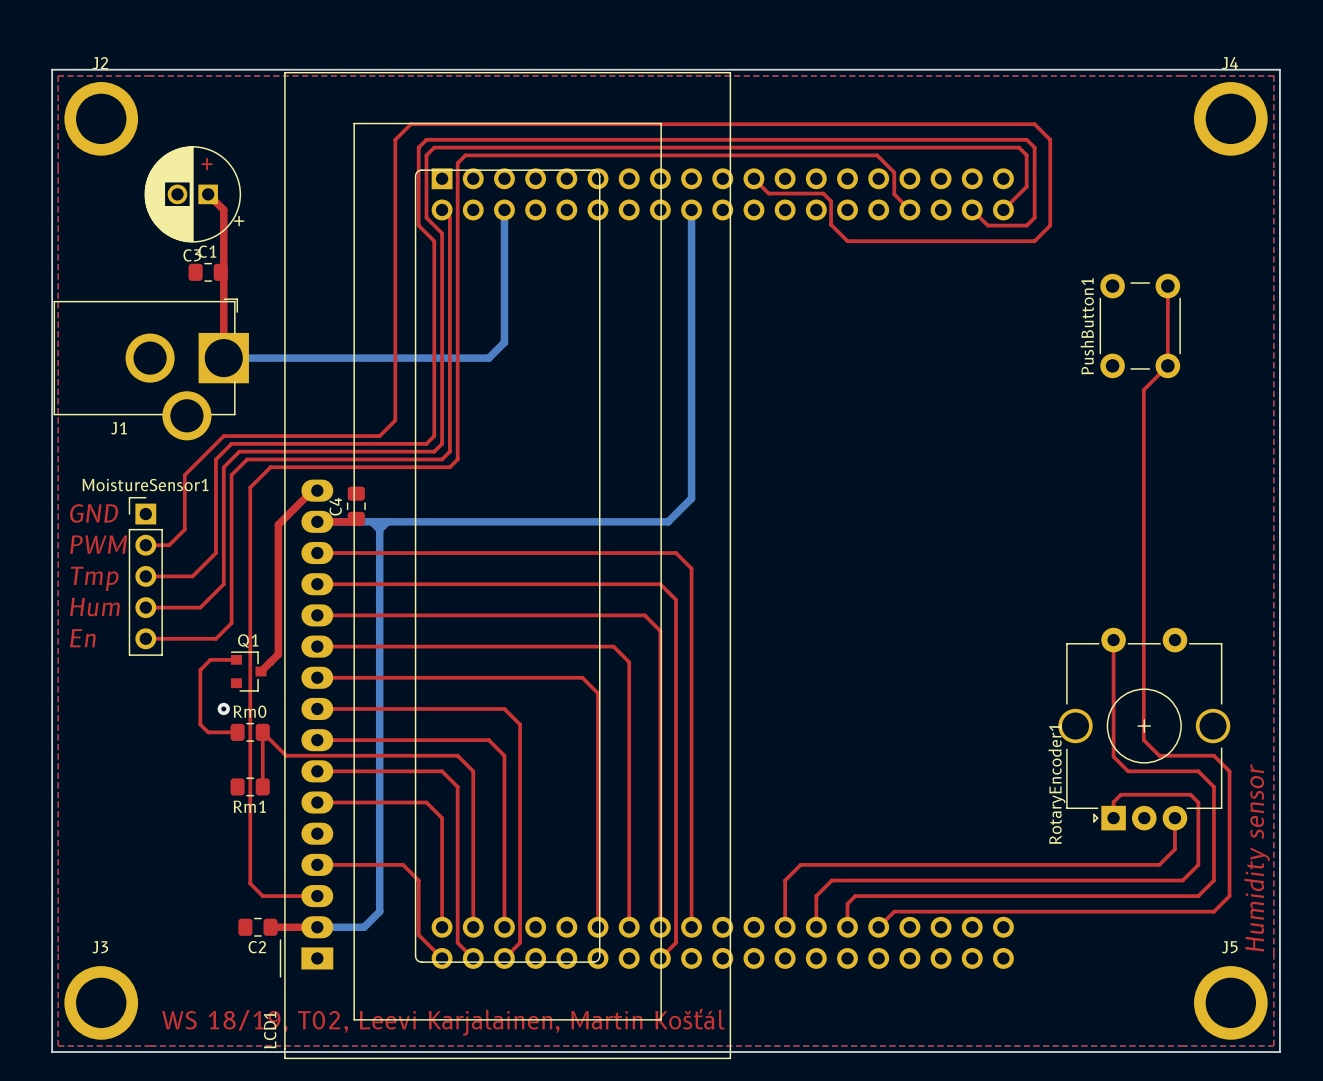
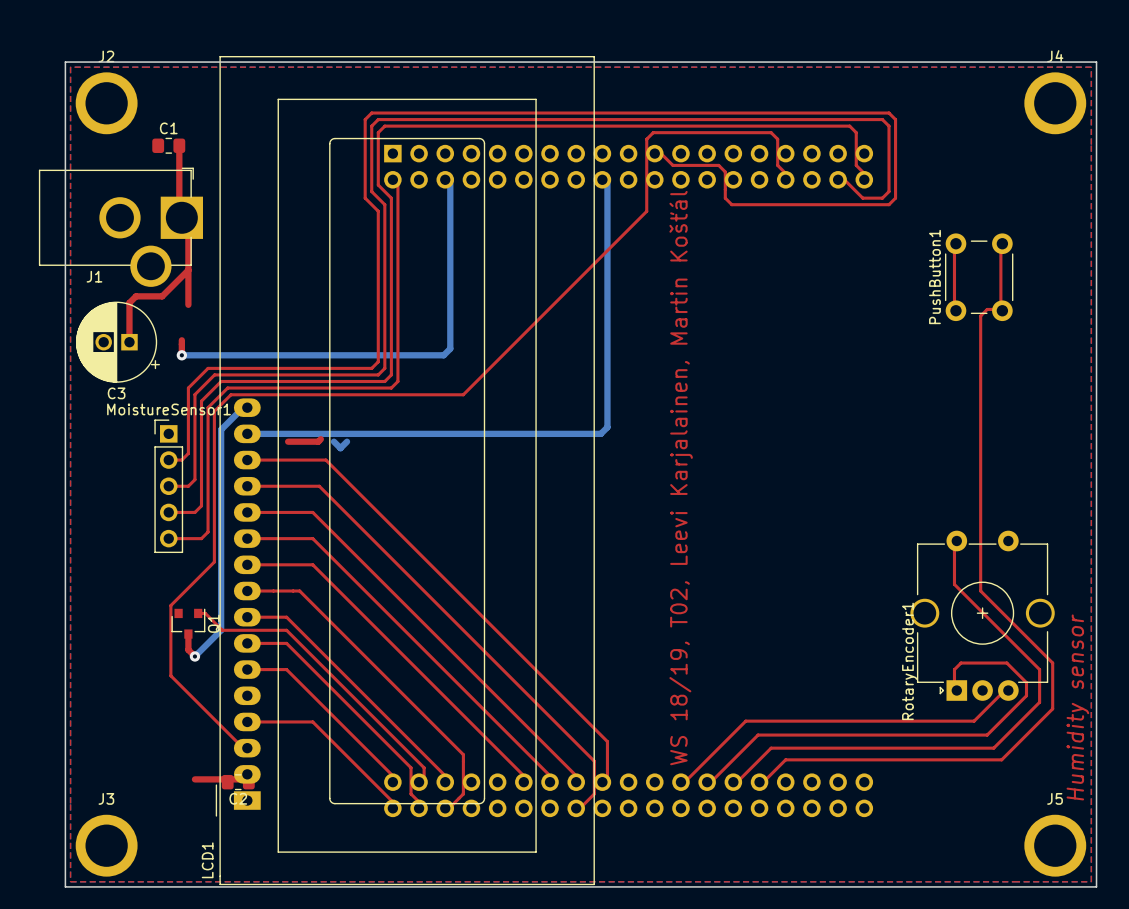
text: + (207, 164) -> none
top track: none -> (179, 145) (179, 215) (188, 224) (188, 304)
top track: none -> (659, 152) (672, 165) (718, 165) (725, 171) (725, 198) (731, 204) (889, 204) (895, 198) (895, 119) (889, 113) (371, 113) (365, 119) (365, 198) (378, 211) (378, 361) (371, 368) (208, 368) (188, 388) (188, 453) (181, 460) (168, 460)
top track: (753, 178) (768, 193) (823, 193) (831, 201) (831, 224) (847, 241) (1034, 241) (1050, 225) (1050, 139) (1034, 124) (410, 124) (395, 139) (395, 420) (379, 436) (223, 436) (184, 475) (184, 529) (169, 545) (145, 545) -> none
C3 position: (194, 194) -> (117, 342)
top track: (208, 194) (223, 209) (223, 358) -> none
top track: none -> (397, 178) (397, 381) (391, 388) (227, 388) (208, 407) (208, 532) (201, 538) (168, 538)
bottom track: none -> (450, 178) (450, 348) (443, 355) (181, 355)
bottom track: none -> (607, 178) (607, 427) (600, 433) (247, 433)
top track: none -> (790, 178) (777, 165) (777, 139) (771, 132) (653, 132) (646, 139) (646, 211) (463, 394) (230, 394) (214, 411) (214, 562) (170, 605) (170, 675) (243, 748) (247, 748)
top track: none -> (843, 178) (862, 198) (882, 198) (889, 191) (889, 126) (882, 119) (378, 119) (371, 126) (371, 191) (384, 204) (384, 368) (378, 374) (214, 374) (194, 394) (194, 479) (188, 486) (168, 486)
top track: none -> (869, 178) (856, 165) (856, 132) (849, 126) (384, 126) (378, 132) (378, 185) (391, 198) (391, 374) (384, 381) (221, 381) (201, 401) (201, 505) (194, 512) (168, 512)
top track: (442, 209) (449, 217) (449, 451) (442, 459) (247, 459) (231, 475) (231, 623) (215, 638) (145, 638) -> none
bottom track: (504, 209) (504, 342) (488, 358) (223, 358) -> none
bottom track: (691, 209) (691, 498) (668, 521) (317, 521) -> none
top track: (909, 209) (894, 194) (894, 172) (877, 155) (465, 155) (457, 163) (457, 459) (449, 467) (270, 467) (250, 487) (250, 883) (262, 896) (317, 896) -> none
top track: (972, 209) (987, 225) (1026, 225) (1034, 217) (1034, 147) (1026, 139) (426, 139) (418, 147) (418, 225) (434, 241) (434, 436) (426, 443) (231, 443) (215, 459) (215, 553) (192, 576) (145, 576) -> none
top track: (1003, 209) (1026, 186) (1026, 155) (1019, 147) (434, 147) (426, 155) (426, 217) (442, 233) (442, 443) (434, 451) (239, 451) (223, 467) (223, 584) (200, 607) (145, 607) -> none
C1 position: (208, 272) -> (168, 145)
top track: none -> (954, 242) (954, 309)
top track: none -> (1000, 242) (1000, 309) (987, 309) (980, 316) (980, 591) (1052, 663) (1052, 708) (1001, 759) (785, 759) (764, 780)
top track: (1167, 286) (1167, 365) (1143, 389) (1143, 740) (1159, 755) (1213, 755) (1229, 771) (1229, 896) (1213, 911) (894, 911) (878, 927) -> none
top track: none -> (188, 270) (162, 296) (136, 296) (129, 302) (129, 342)
J1 position: (151, 369) -> (120, 227)
top track: none -> (181, 340) (181, 355)
via: none -> (181, 355)
bottom track: none -> (247, 407) (243, 407) (221, 429) (221, 630) (194, 656)
top track: (317, 490) (312, 490) (278, 524) (278, 654) (270, 662) -> none
C4: (356, 506) -> none
text: GND (94, 513) -> none
bottom track: (379, 521) (379, 911) (364, 927) (317, 927) -> none
top track: none -> (247, 460) (325, 460) (607, 741) (607, 780)
text: PWM (98, 544) -> none
top track: (317, 553) (675, 553) (691, 568) (691, 925) -> none
LCD1 position: (505, 565) -> (405, 470)
top track: none -> (247, 486) (319, 486) (594, 761) (594, 793) (581, 807)
MoistureSensor1 position: (145, 576) -> (168, 486)
text: Tmp (94, 578) -> none
top track: (317, 584) (660, 584) (675, 599) (675, 942) (660, 958) -> none
top track: none -> (247, 512) (312, 512) (581, 780)
text: Hum (94, 607) -> none
top track: (317, 615) (644, 615) (660, 630) (660, 927) -> none
text: none -> WS 18/19, T02, Leevi Karjalainen, Martin Košťál (681, 478)
top track: none -> (247, 538) (312, 538) (555, 780)
text: En (82, 638) -> none
top track: none -> (954, 539) (954, 584) (1039, 669) (1039, 702) (993, 748) (771, 748) (738, 780)
top track: (1113, 640) (1113, 756) (1128, 771) (1198, 771) (1213, 786) (1213, 880) (1198, 896) (855, 896) (847, 903) (847, 927) -> none
top track: (317, 646) (613, 646) (629, 662) (629, 927) -> none
top track: (236, 659) (210, 659) (200, 669) (200, 724) (208, 732) (237, 732) -> none
top track: none -> (247, 564) (312, 564) (528, 780)
Q1 rotation: 0° (248, 671) -> 90° clockwise (188, 623)
Q1 position: (248, 671) -> (188, 623)
top track: (317, 677) (582, 677) (598, 693) (598, 927) -> none
top track: none -> (247, 591) (299, 591) (463, 754) (463, 793) (450, 807)
via position: (223, 708) -> (194, 656)
top track: (317, 708) (504, 708) (520, 724) (520, 942) (504, 958) -> none
top track: none -> (198, 613) (205, 613) (222, 630) (286, 630) (424, 767) (424, 780)
top track: none -> (247, 617) (286, 617) (450, 780)
Rm0: (250, 732) -> none
top track: (317, 740) (488, 740) (504, 755) (504, 927) -> none
top track: none -> (188, 634) (188, 649) (194, 656)
top track: none -> (247, 643) (286, 643) (411, 767) (411, 793) (424, 807)
top track: (317, 771) (442, 771) (457, 786) (457, 942) (473, 958) -> none
Rm1: (250, 786) -> none
top track: (262, 786) (262, 732) (286, 755) (457, 755) (473, 771) (473, 927) -> none
top track: none -> (247, 669) (286, 669) (397, 780)
top track: (317, 802) (426, 802) (442, 818) (442, 927) -> none
top track: none -> (954, 689) (954, 669) (961, 663) (1006, 663) (1026, 682) (1026, 695) (987, 735) (758, 735) (712, 780)
top track: none -> (1006, 689) (974, 721) (745, 721) (686, 780)
top track: (1113, 818) (1113, 802) (1120, 794) (1190, 794) (1198, 802) (1198, 864) (1182, 880) (831, 880) (816, 896) (816, 927) -> none
top track: (1174, 818) (1174, 849) (1159, 864) (800, 864) (785, 880) (785, 927) -> none
top track: none -> (247, 721) (312, 721) (397, 807)
top track: (317, 864) (403, 864) (418, 880) (418, 935) (442, 958) -> none
top track: none -> (247, 774) (242, 779) (194, 779)
top track: (270, 927) (317, 927) -> none
text: WS 18/19, T02, Leevi Karjalainen, Martin Košťál (443, 1022) -> none

